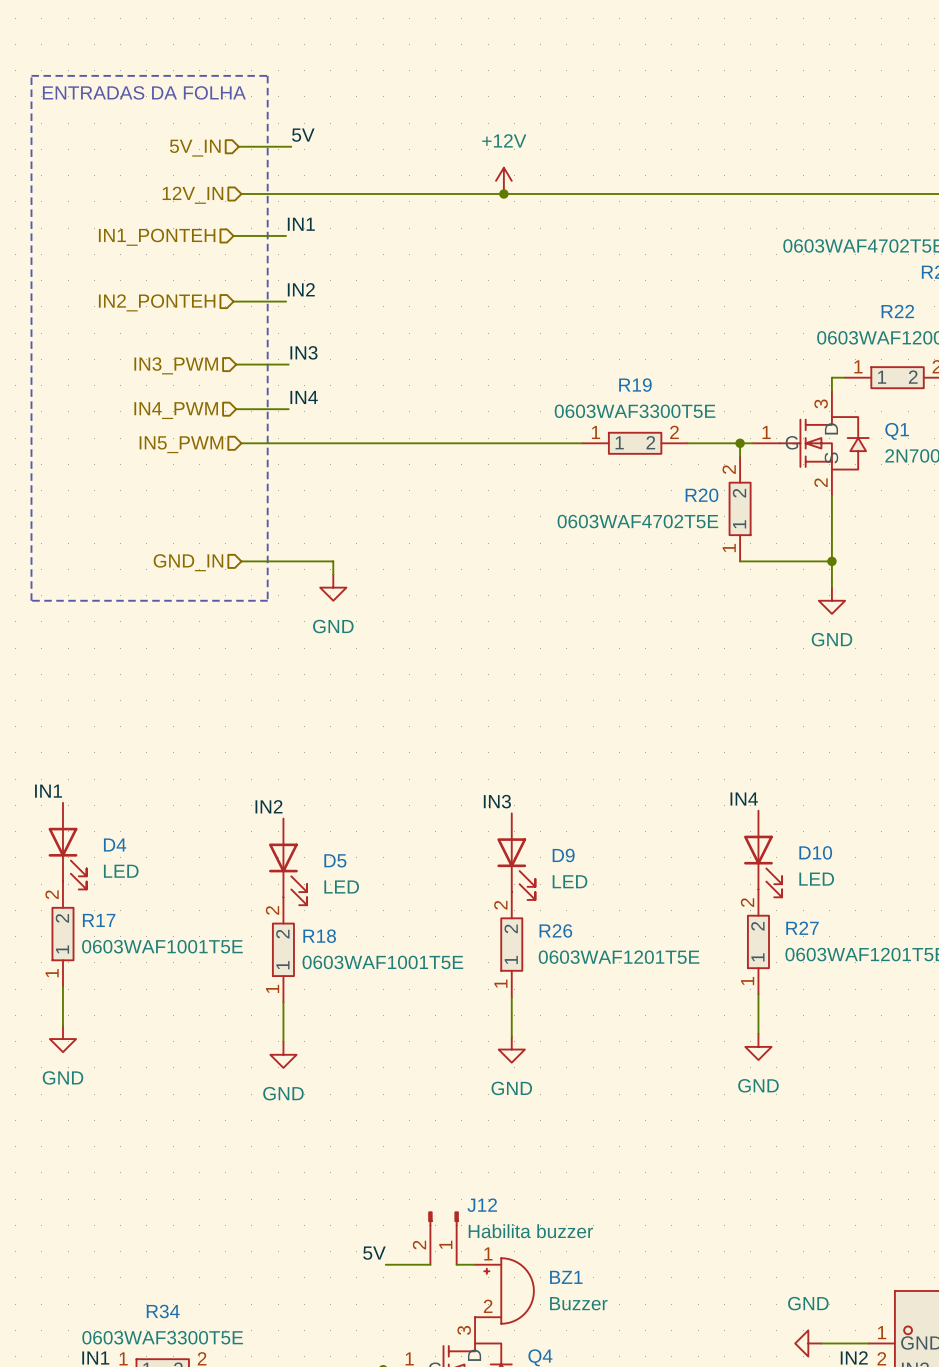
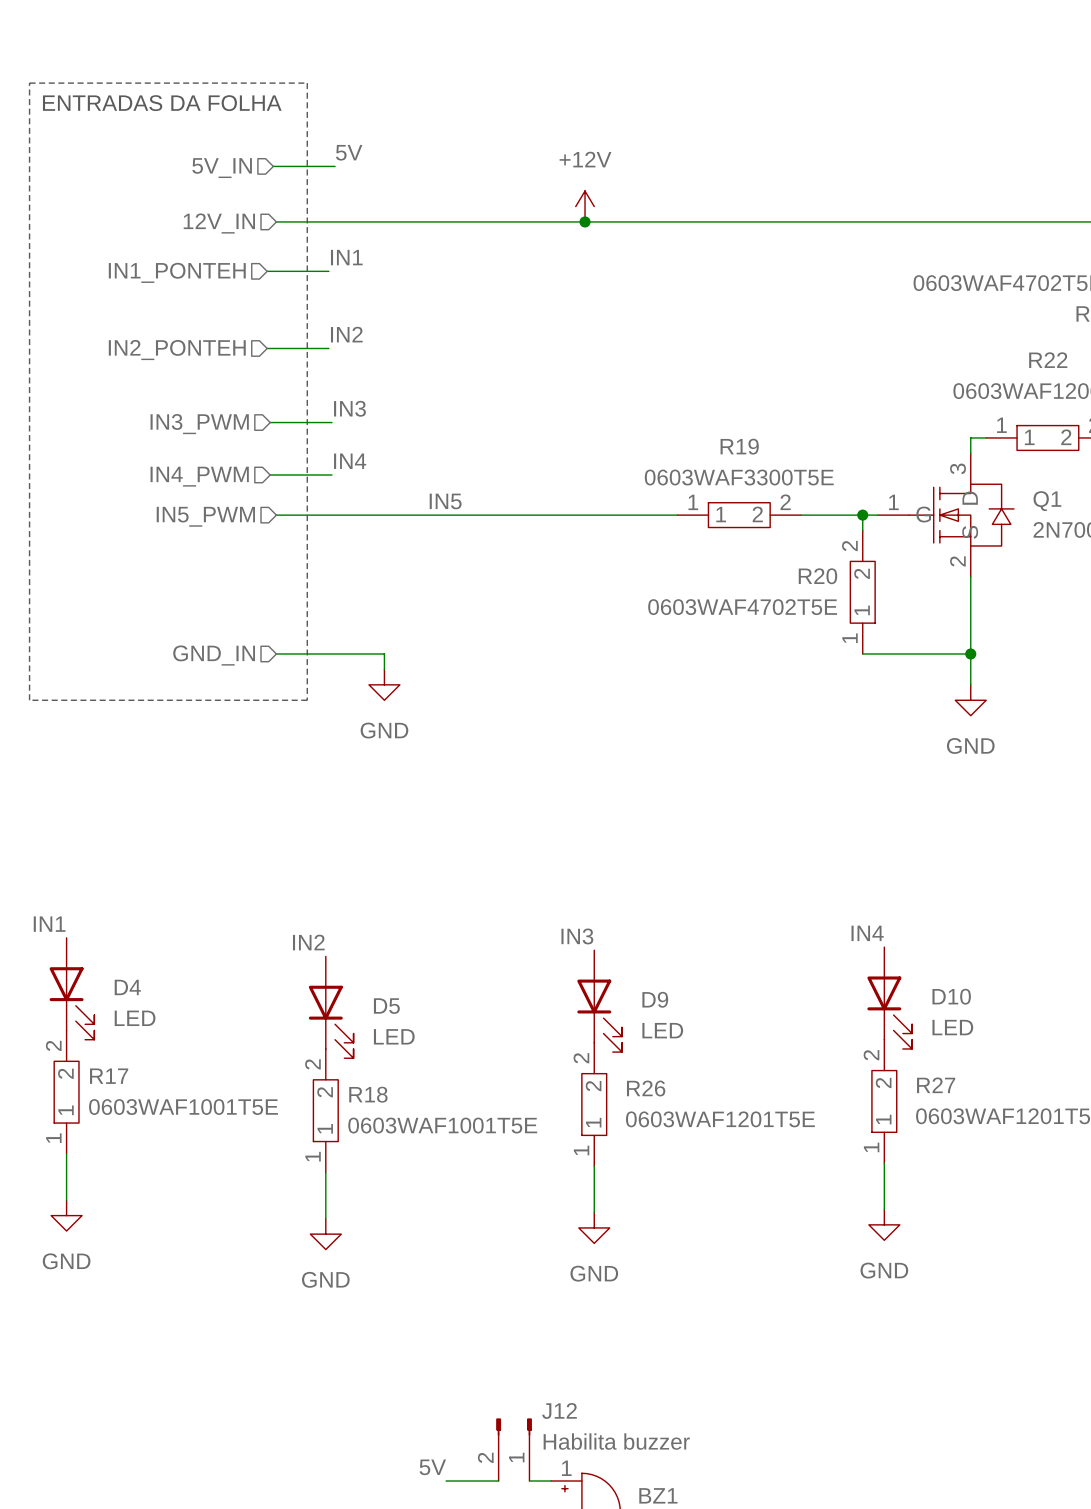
label: none -> IN5 (445, 501)

